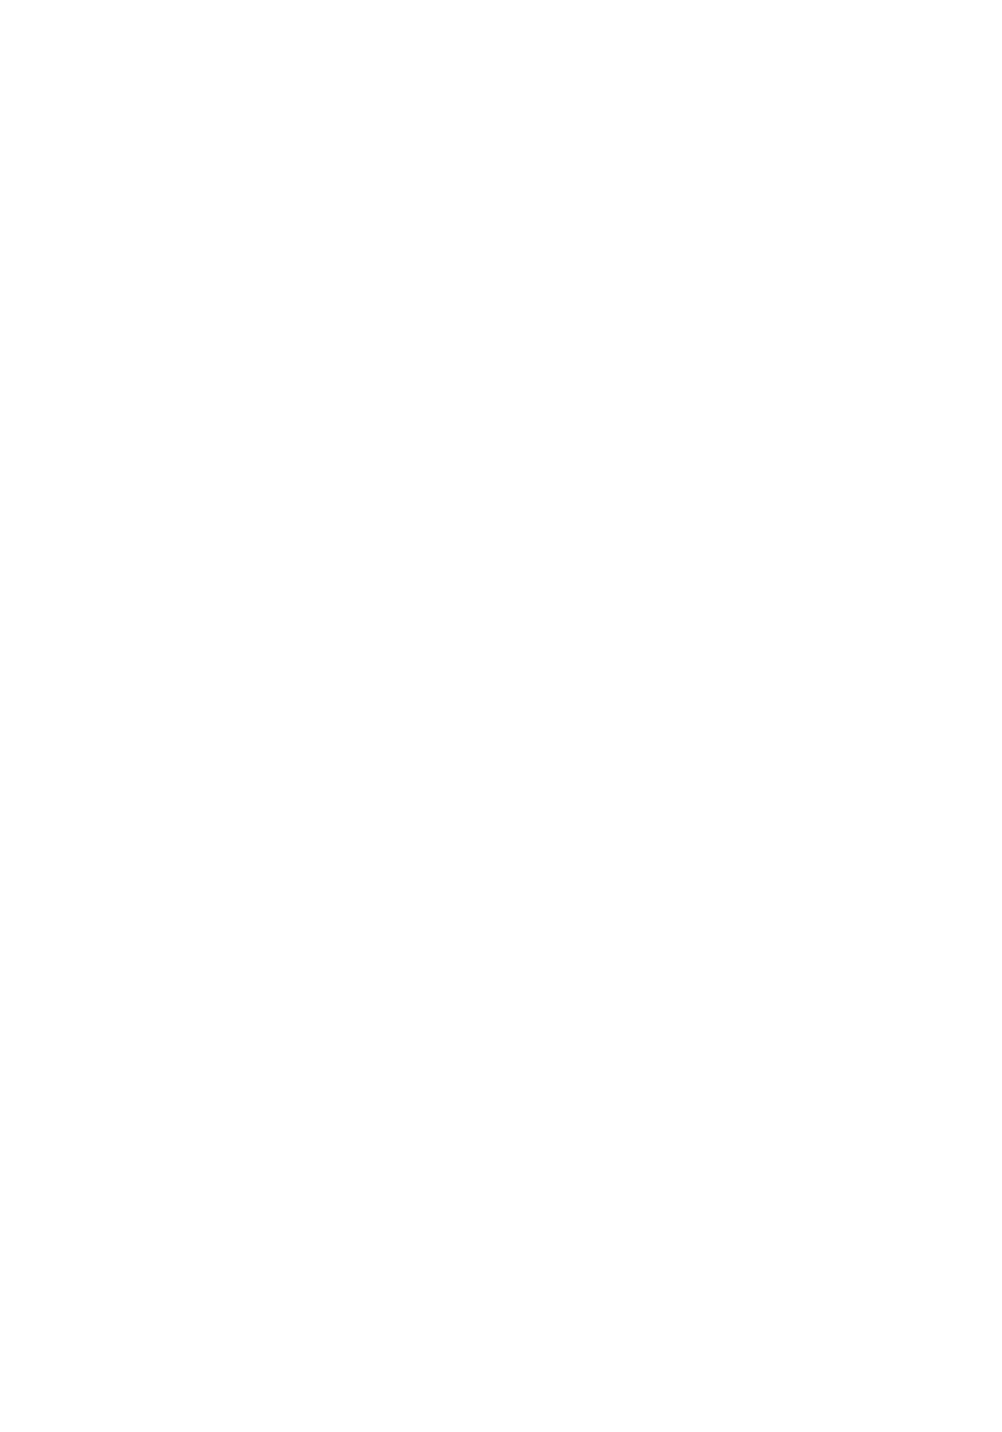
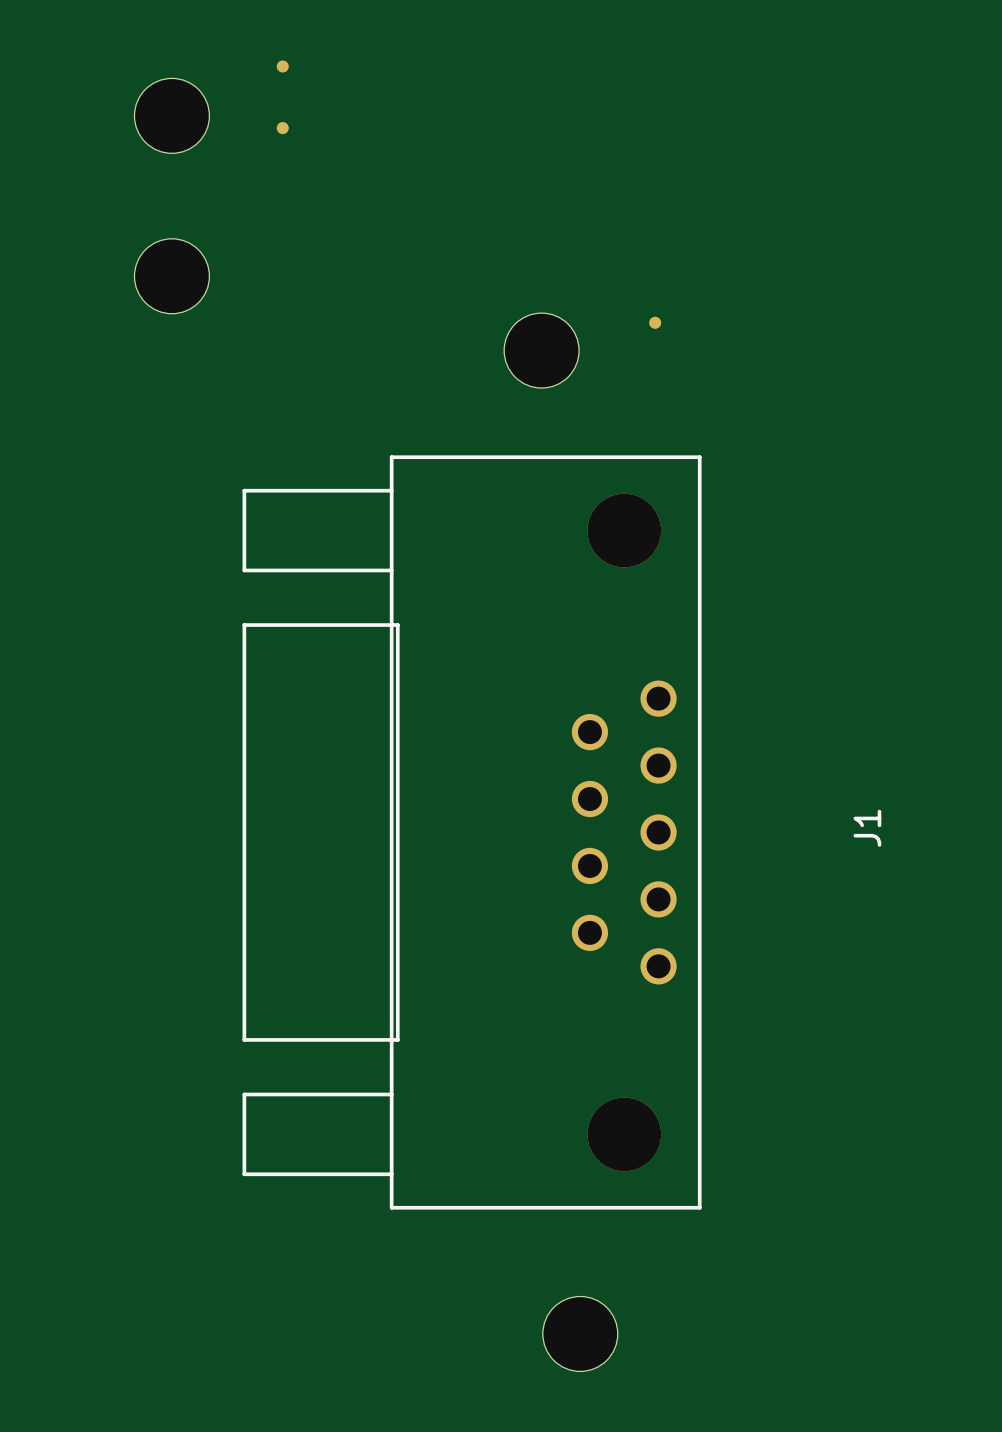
part: none -> (282, 66)
part: none -> (171, 115)
part: none -> (282, 128)
part: none -> (171, 276)
part: none -> (655, 322)
part: none -> (541, 350)
J1: none -> (472, 832)
part: none -> (580, 1333)

